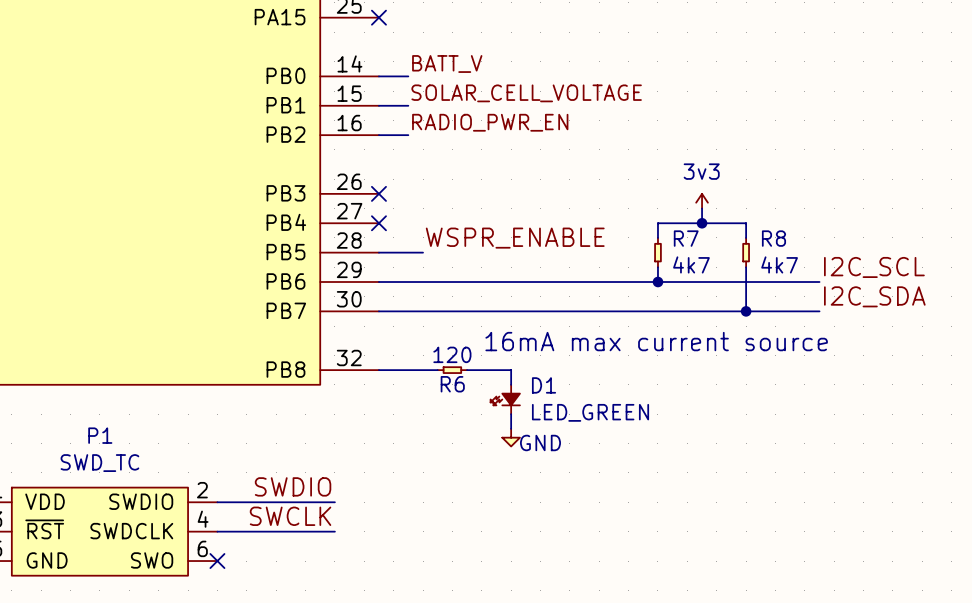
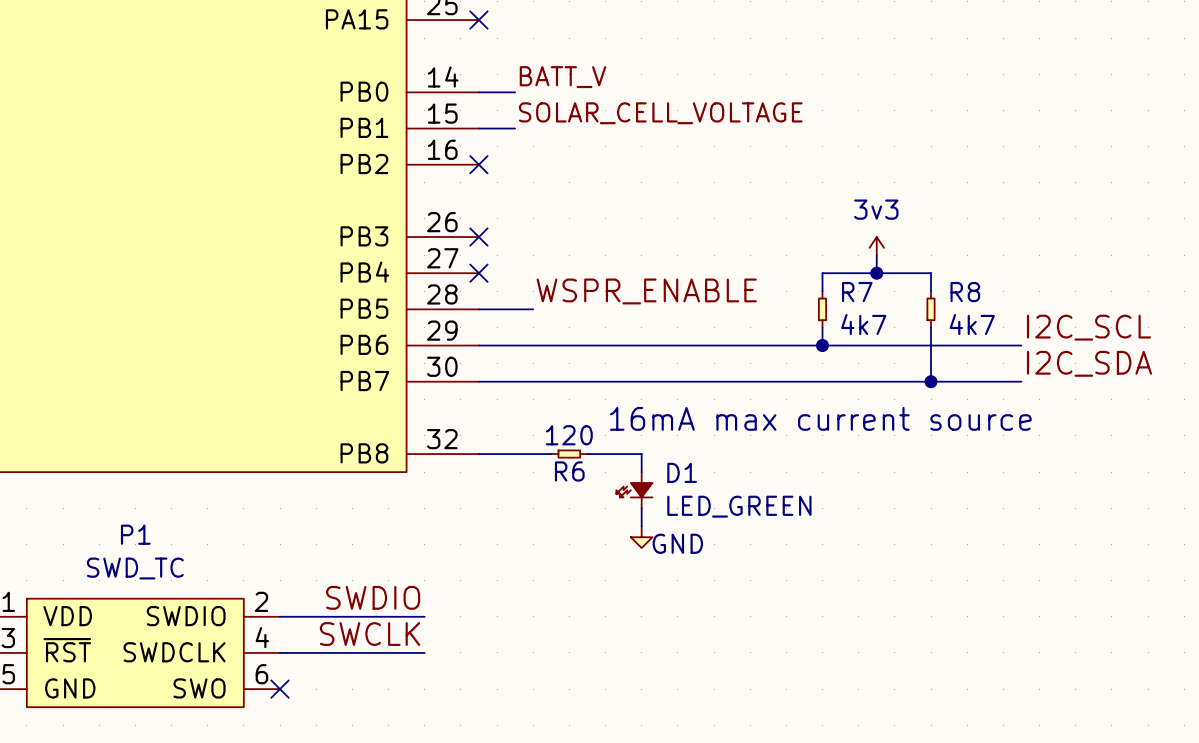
label: RADIO_PWR_EN (490, 122) -> none
wire: (378, 135) (408, 135) -> none
no-connect mark: none -> (478, 164)

